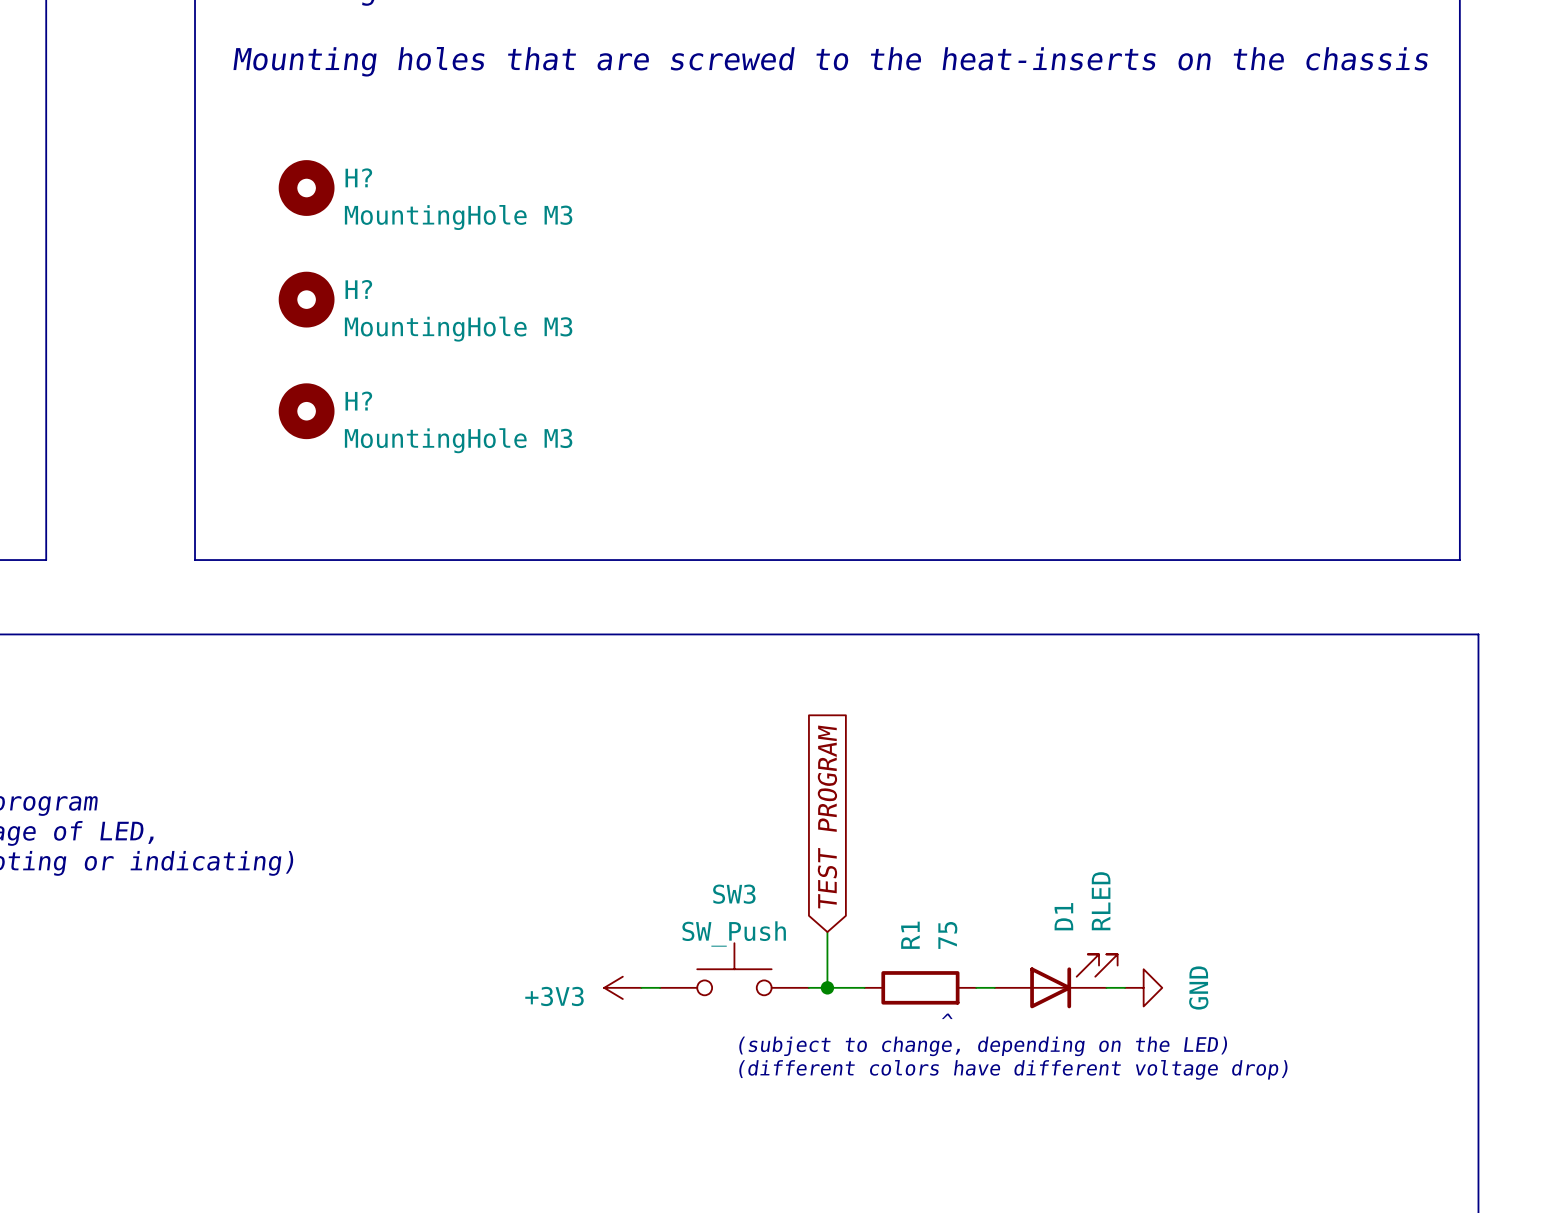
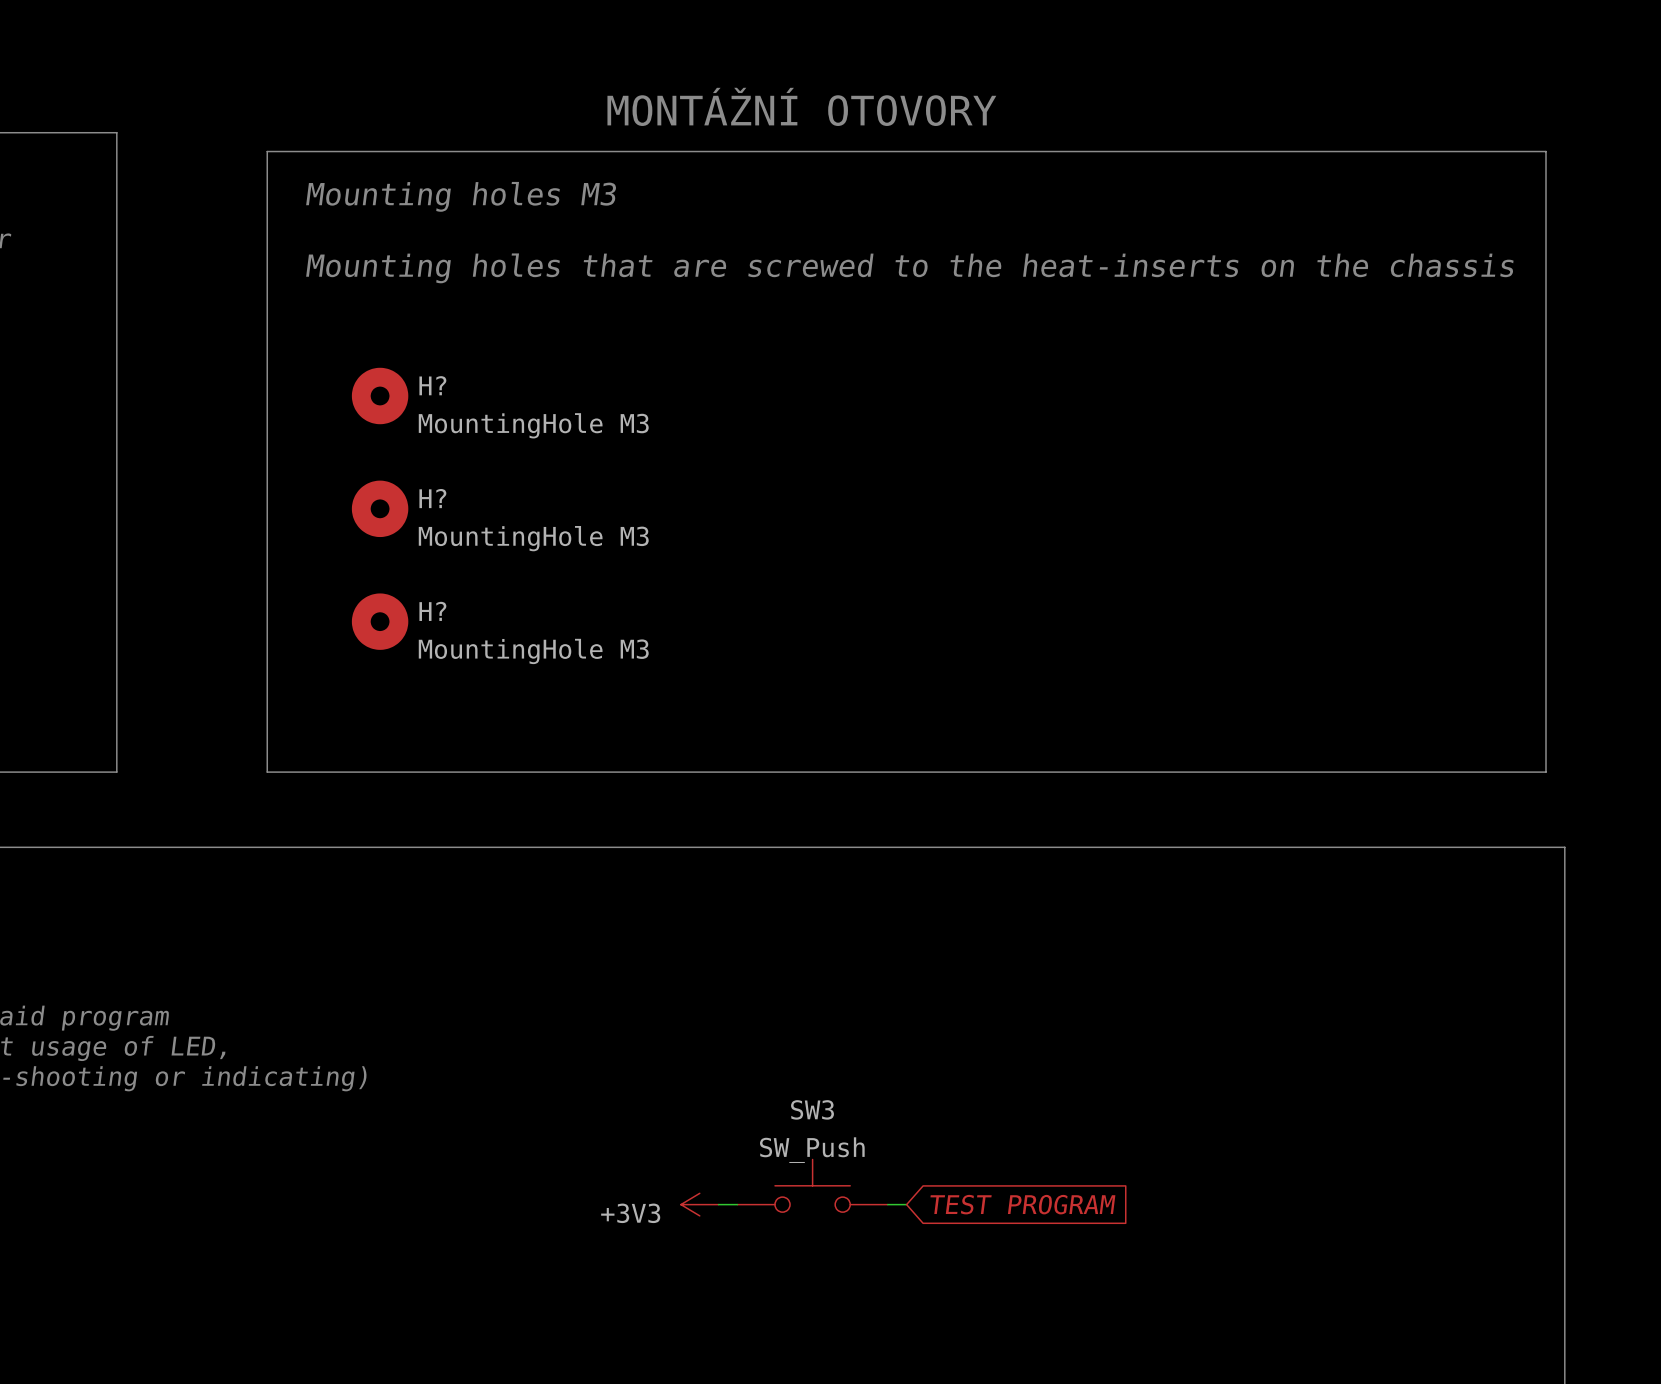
global label rotation: 0° (827, 817) -> 90° clockwise (1022, 1204)
wire: (827, 932) (827, 987) (864, 987) -> none
D1: RLED (1056, 981) -> none
junction: (827, 987) -> none
R1: 75 (920, 987) -> none
wire: (1106, 987) (1125, 987) -> none
power symbol: GND (1143, 987) -> none
text: ^ (947, 1016) -> none
text: (subject to change, depending on the LED) (983, 1046) -> none
text: (different colors have different voltage drop) (1013, 1069) -> none

